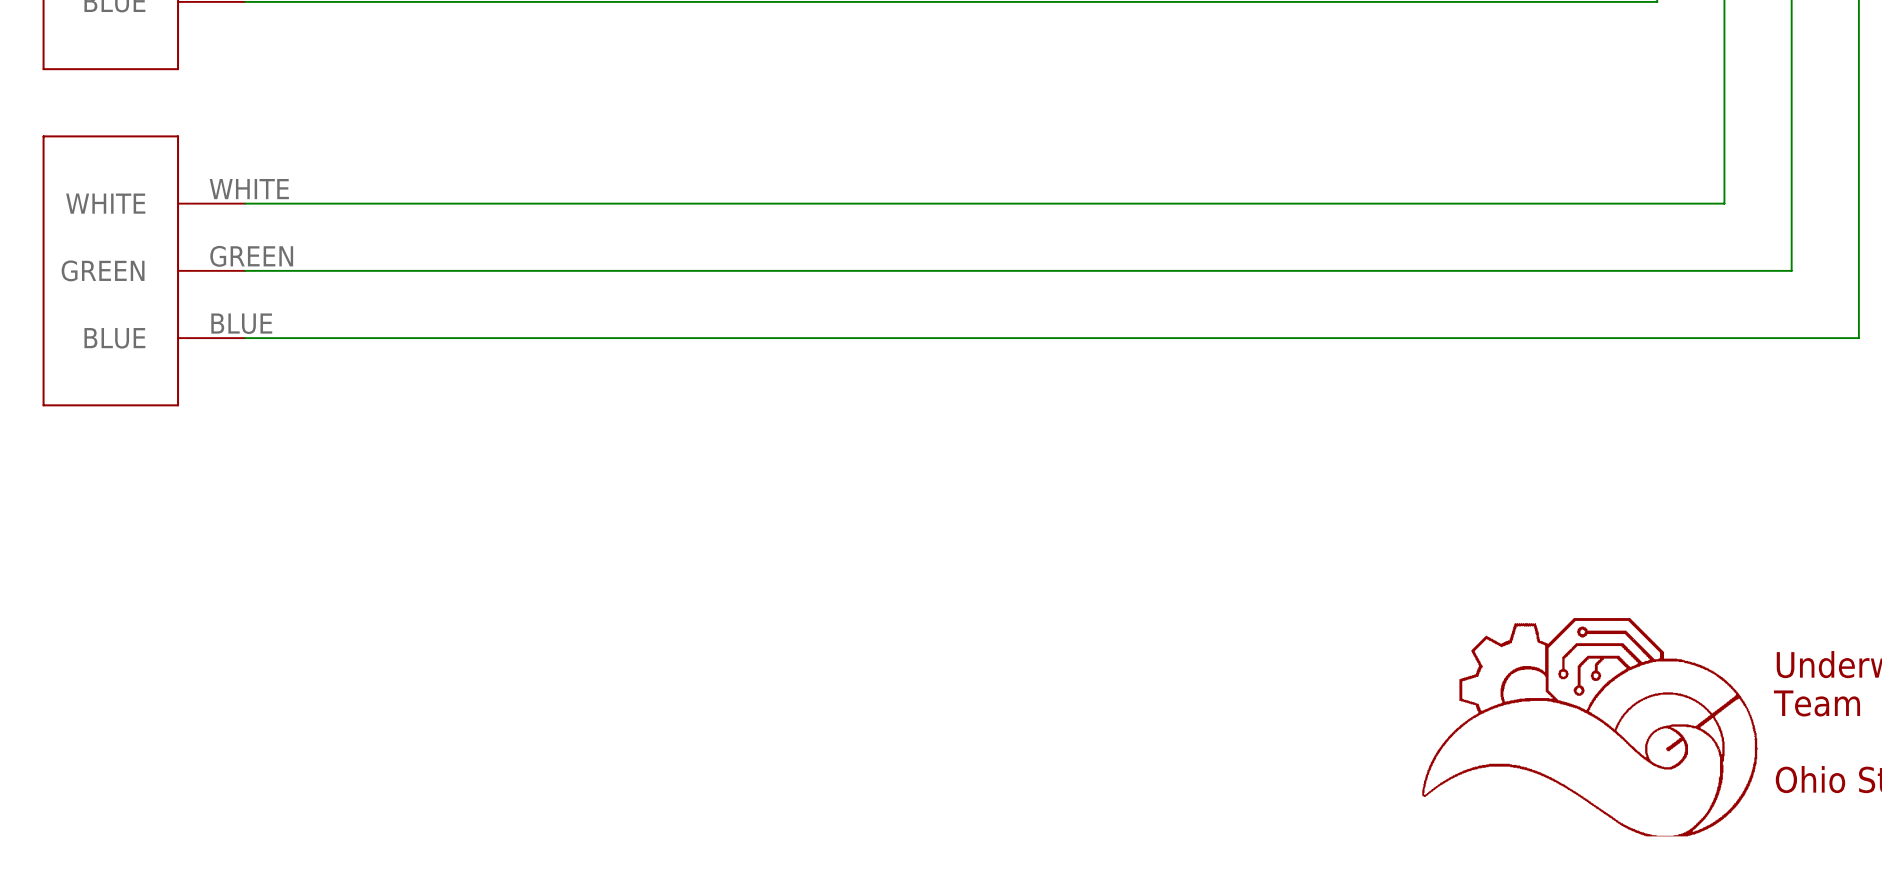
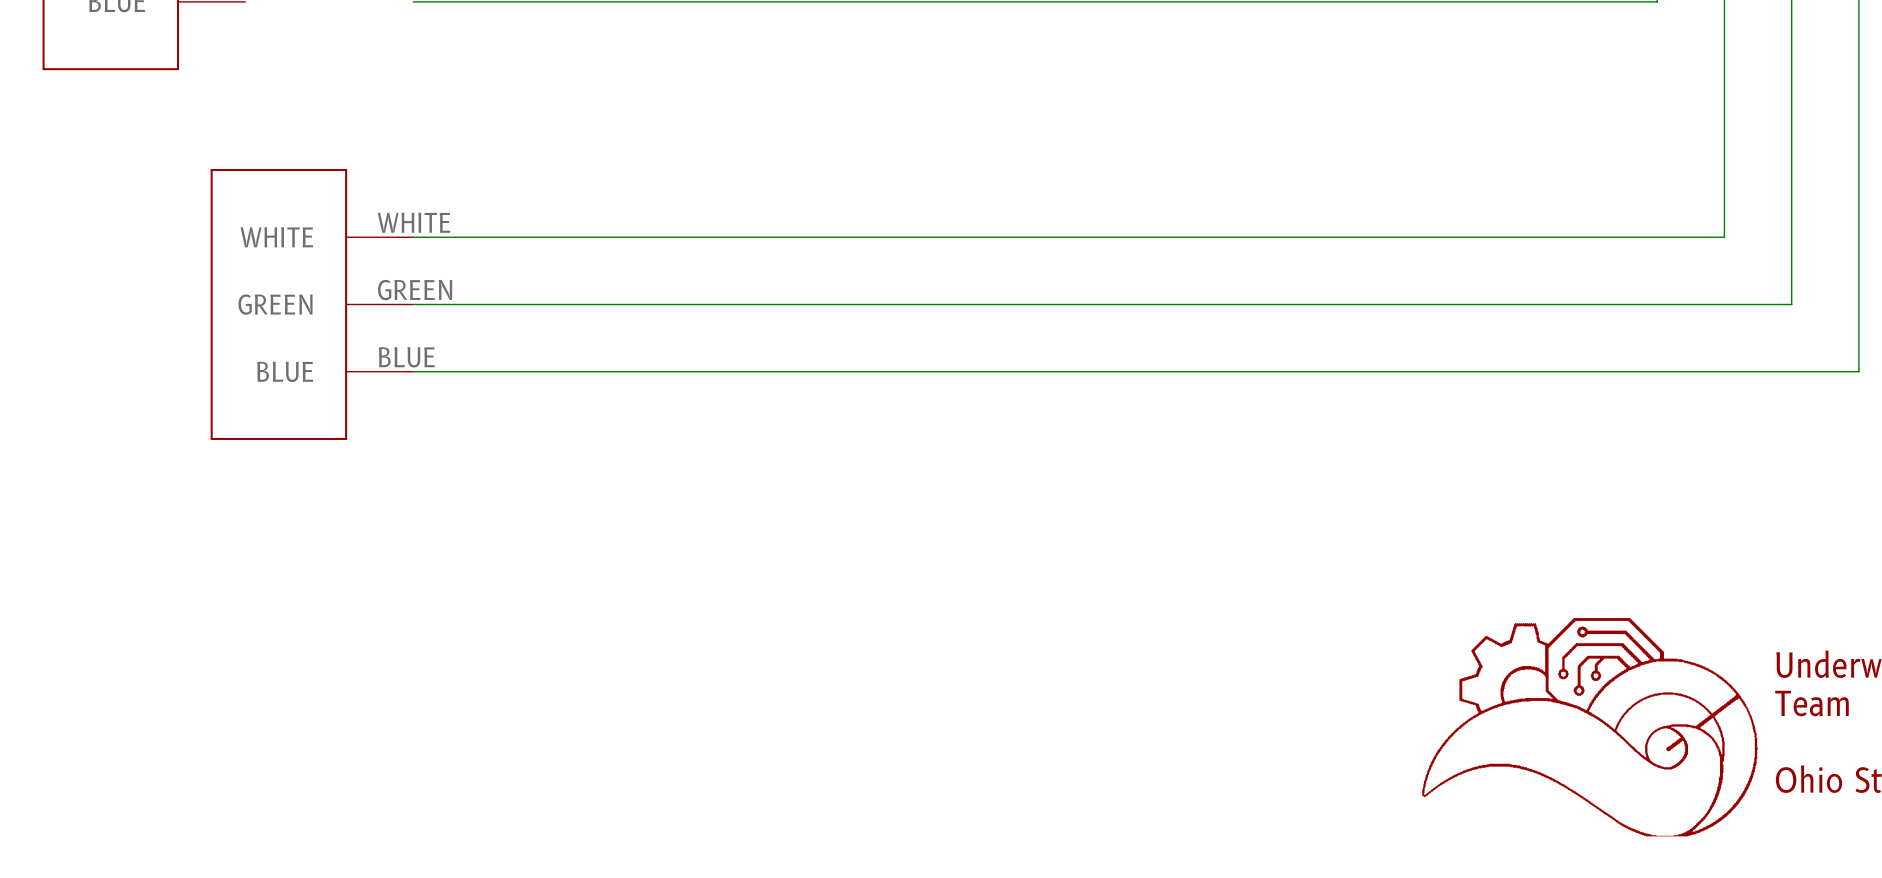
wire: (245, 1) (413, 1) -> none
wire: (245, 203) (1724, 203) -> (413, 237) (1724, 237) (1724, 203)
part position: (143, 270) -> (312, 304)
wire: (245, 270) (1791, 270) -> (413, 304) (1791, 304) (1791, 270)
wire: (245, 338) (1858, 338) -> (413, 371) (1858, 371) (1858, 338)

